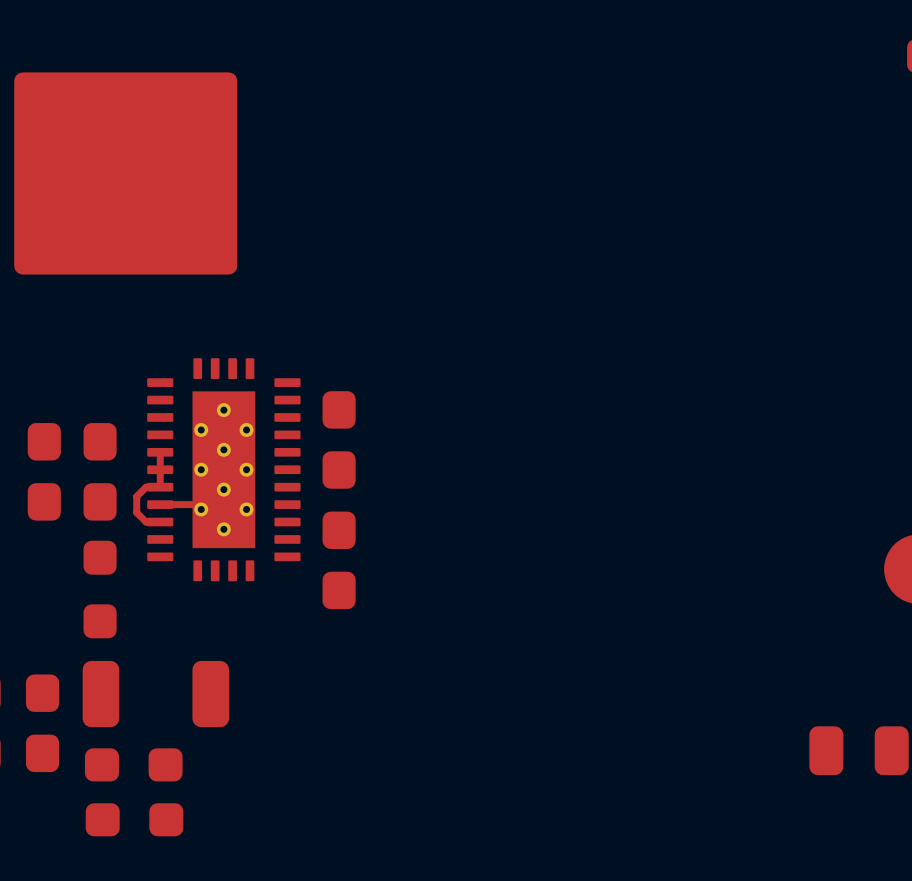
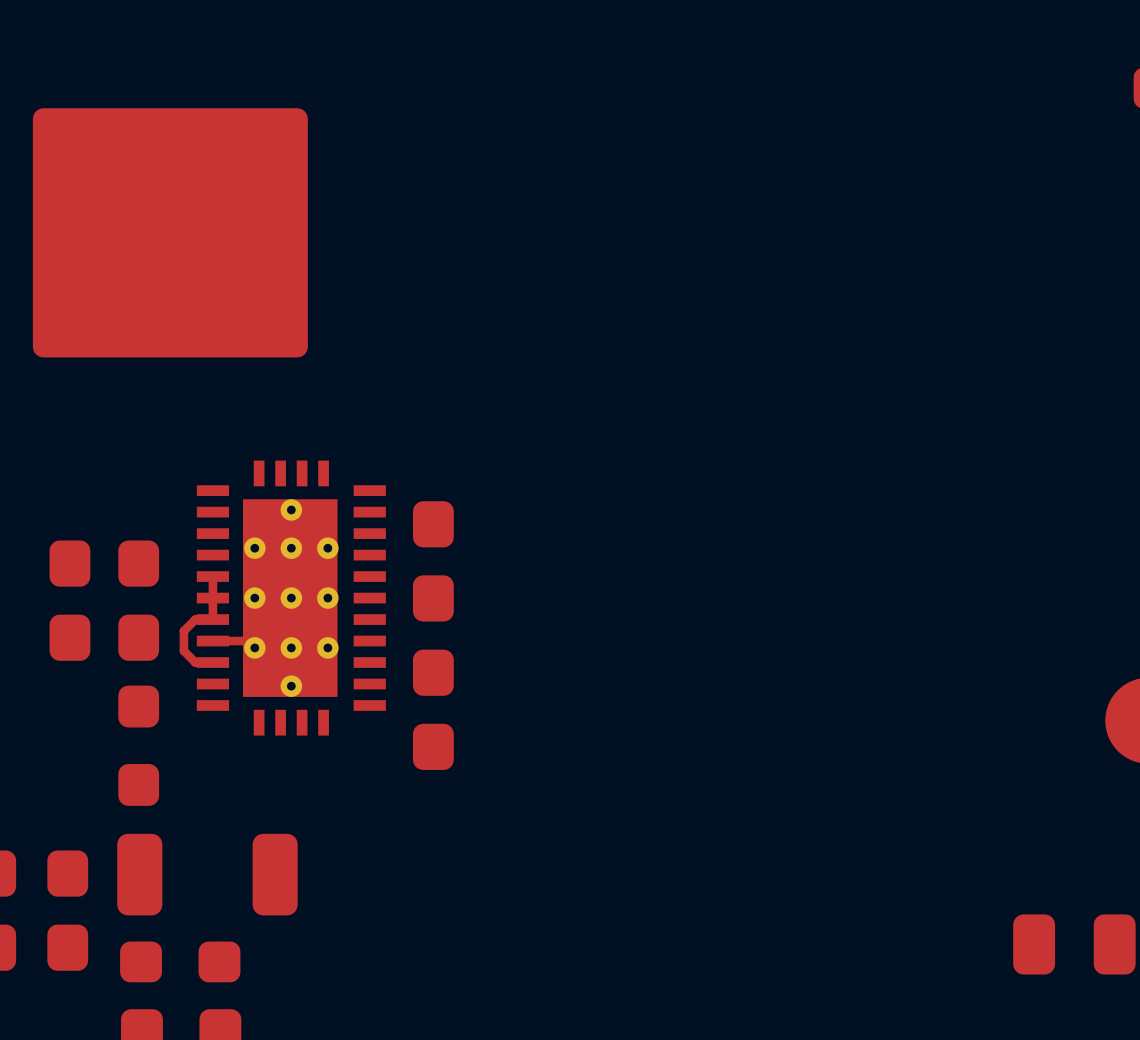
part footprint: [147, 358, 301, 582] -> [196, 460, 386, 736]

